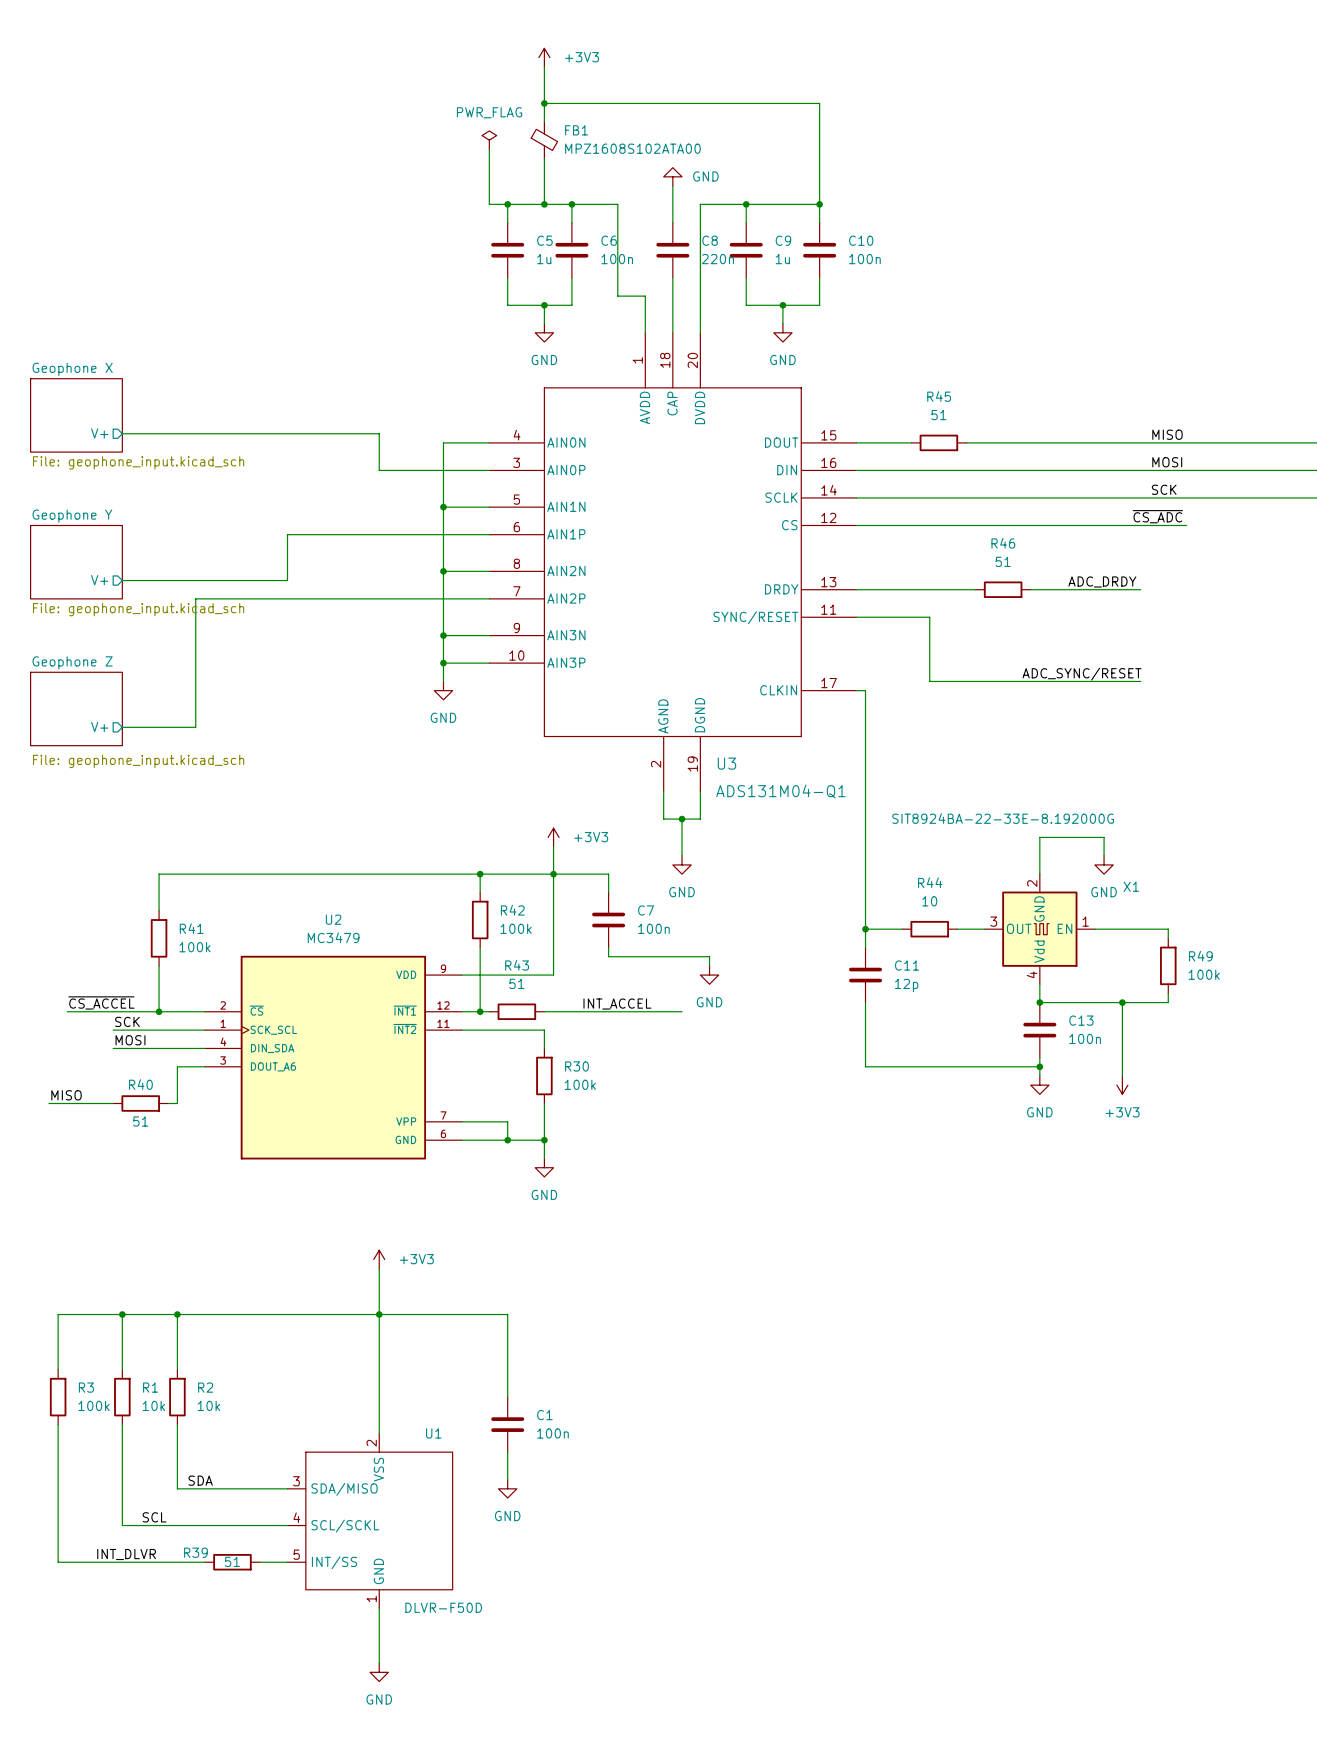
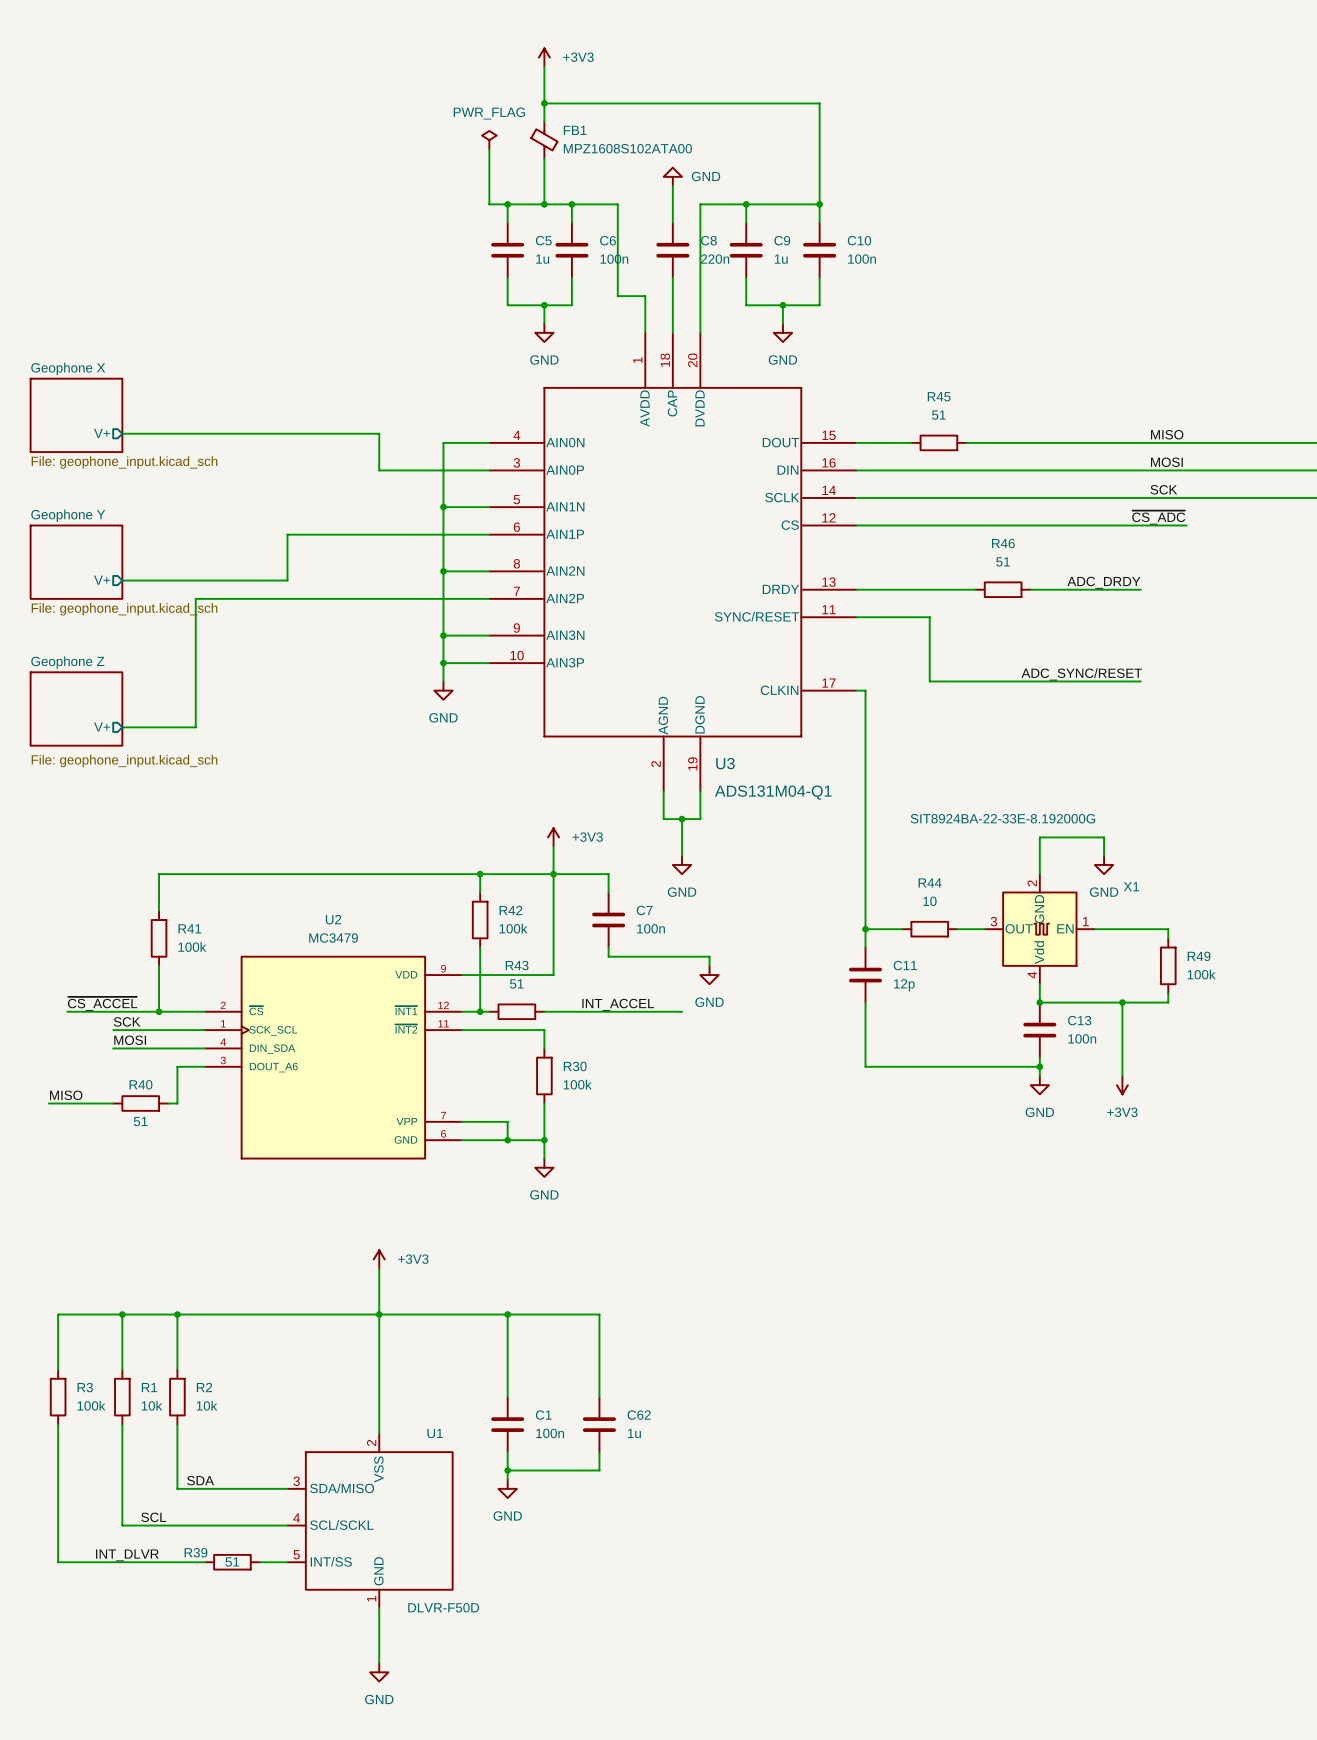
wire: none -> (507, 1314) (599, 1314) (599, 1397)
junction: none -> (507, 1314)
C62: none -> 1u (599, 1424)
wire: none -> (599, 1452) (599, 1470) (507, 1470)
junction: none -> (507, 1470)

